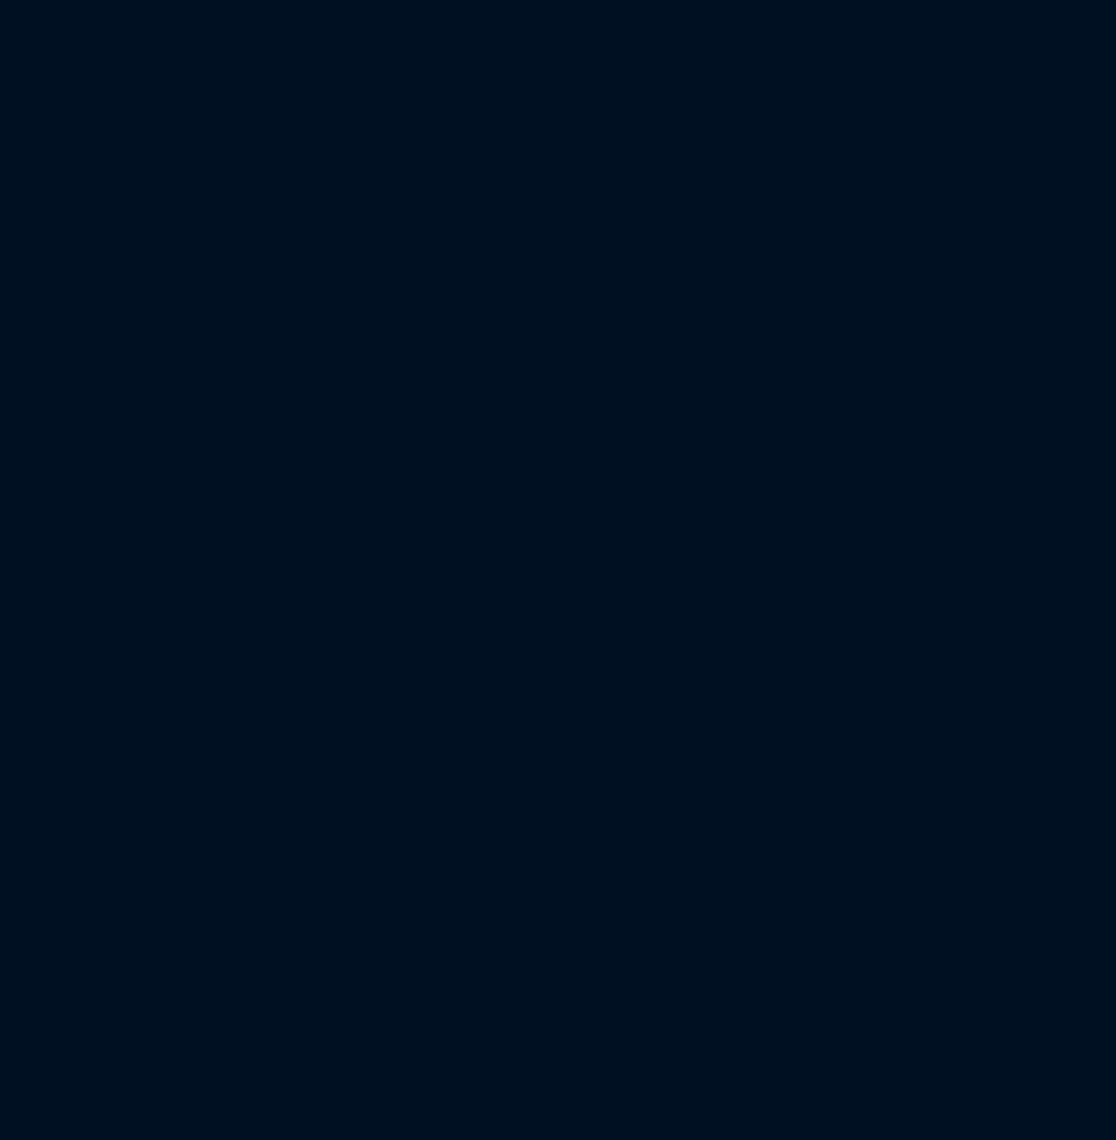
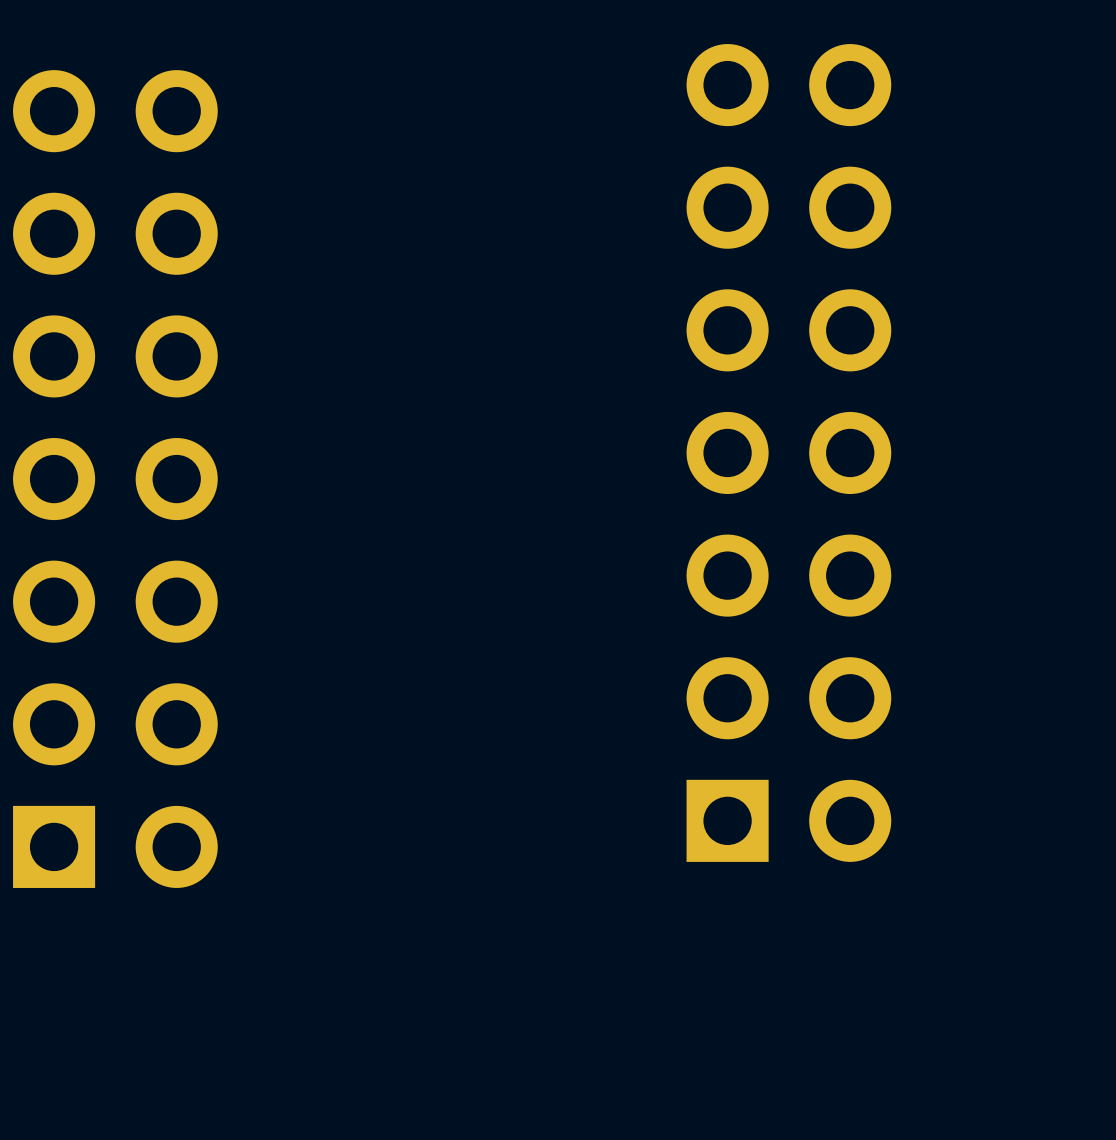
part: none -> (788, 452)
part: none -> (115, 479)

